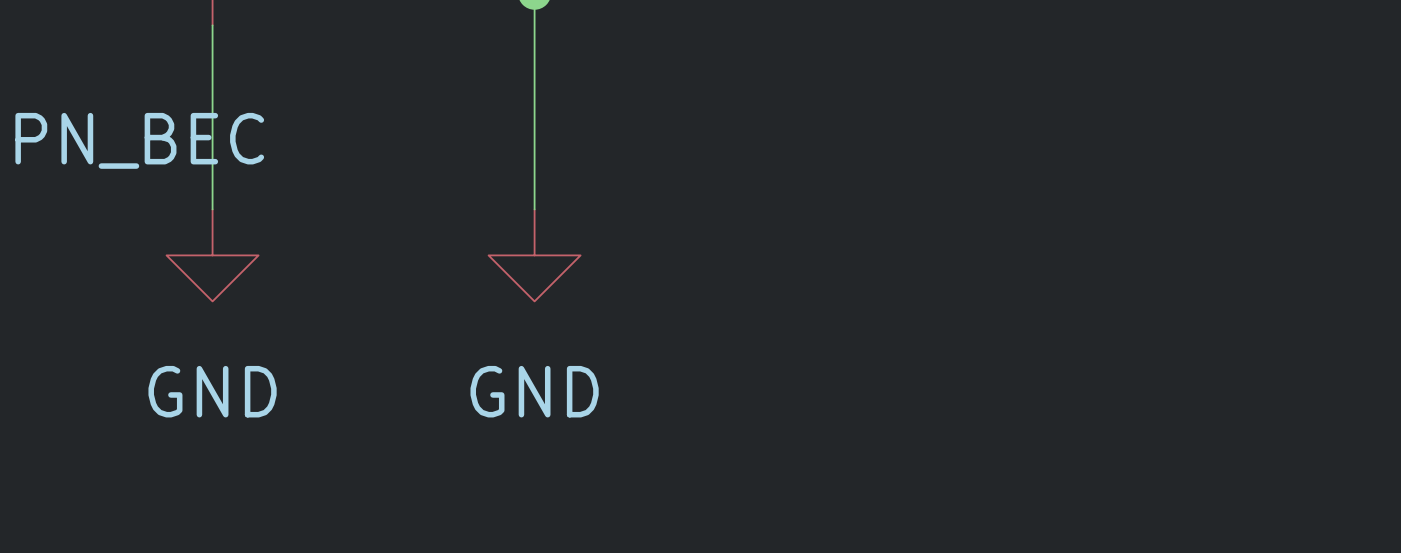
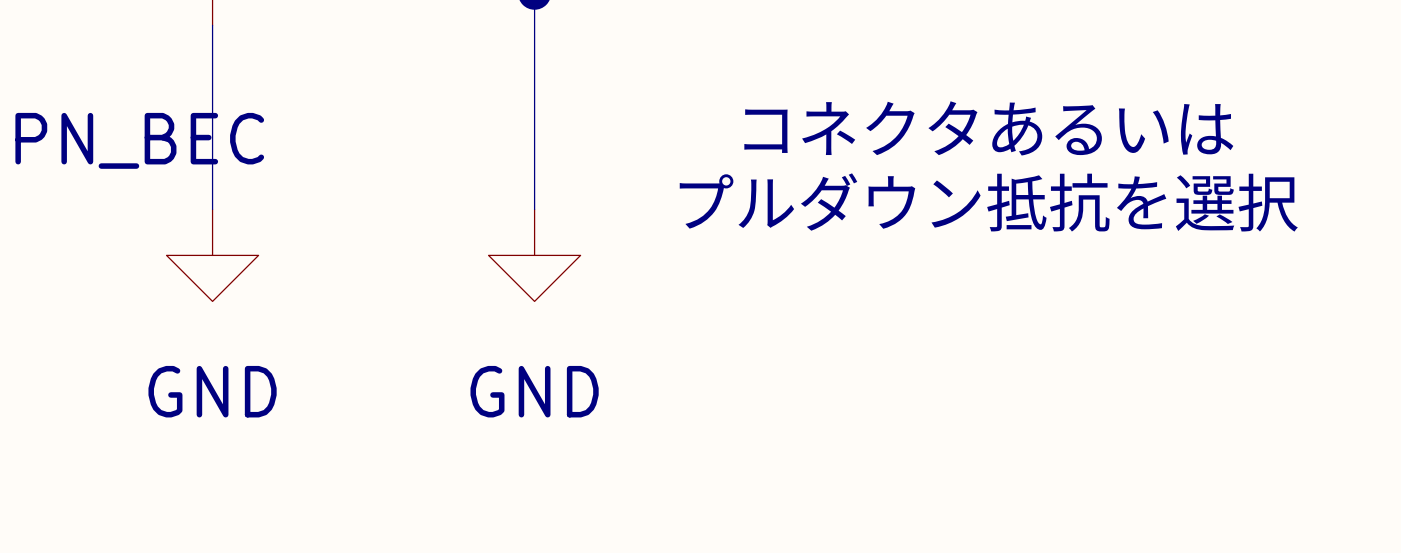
text: none -> コネクタあるいは (988, 128)
text: none -> プルダウン抵抗を選択 (988, 202)

